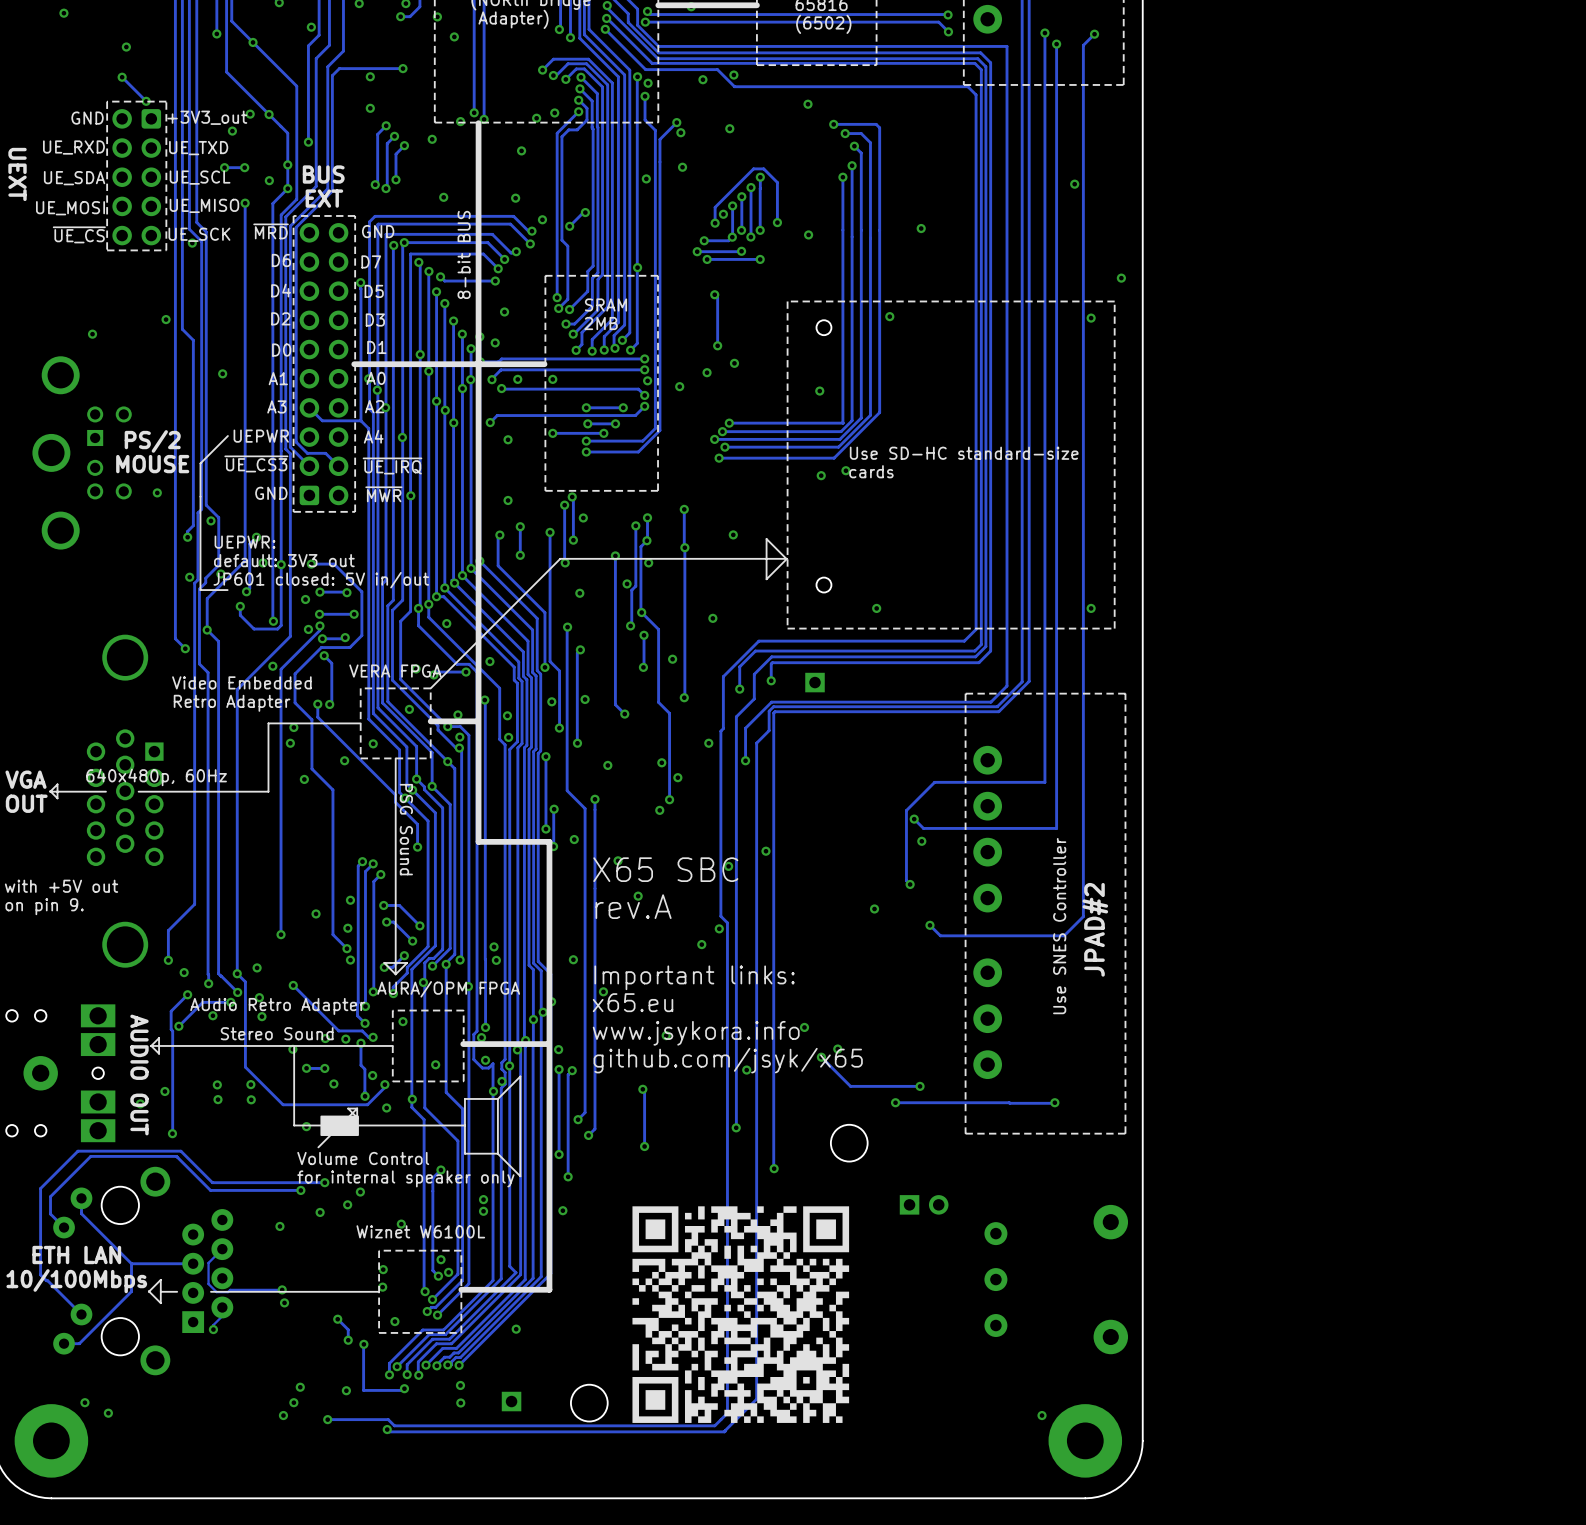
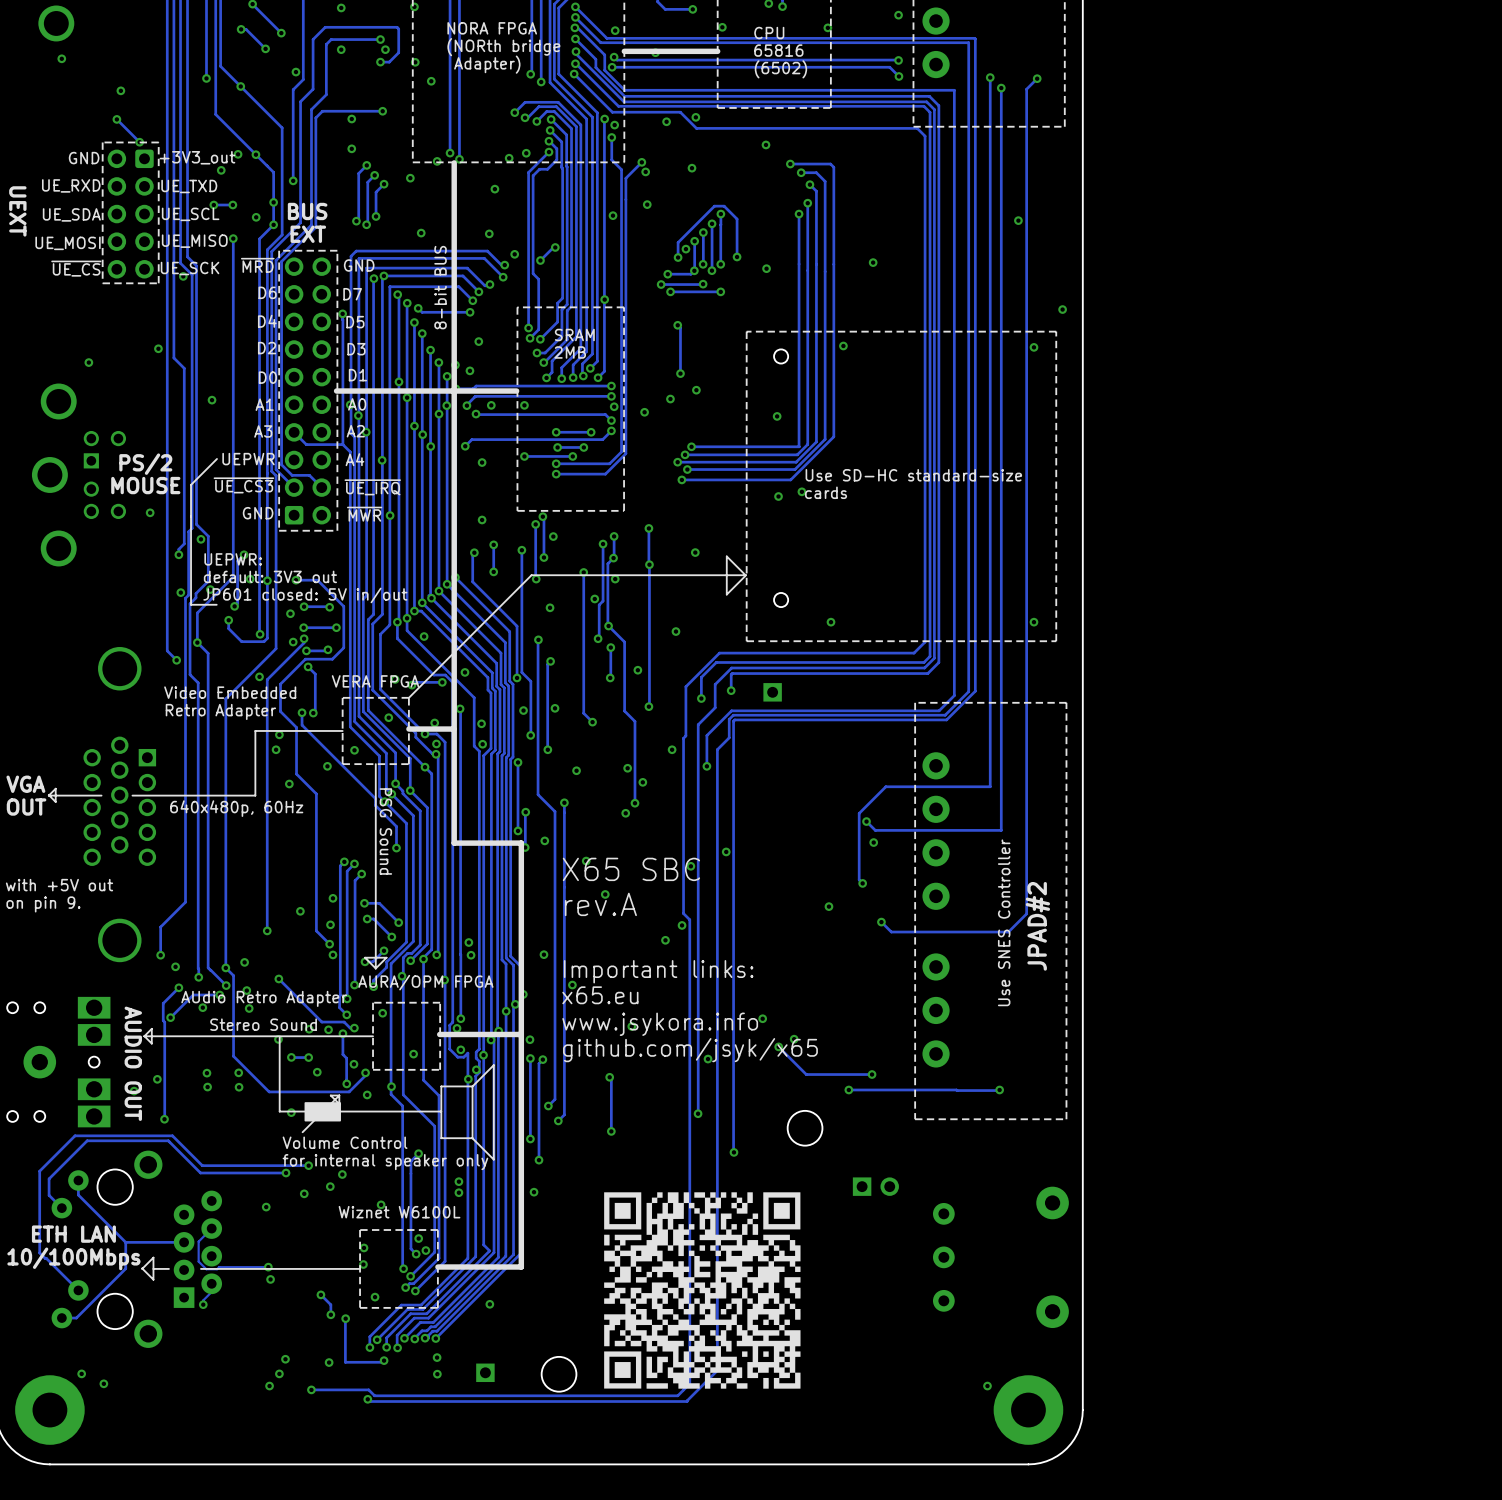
text position: 640x480p, 60Hz (156, 777) -> 640x480p, 60Hz (236, 808)
drawing shape: [632, 1206, 850, 1423] -> [604, 1192, 801, 1389]

